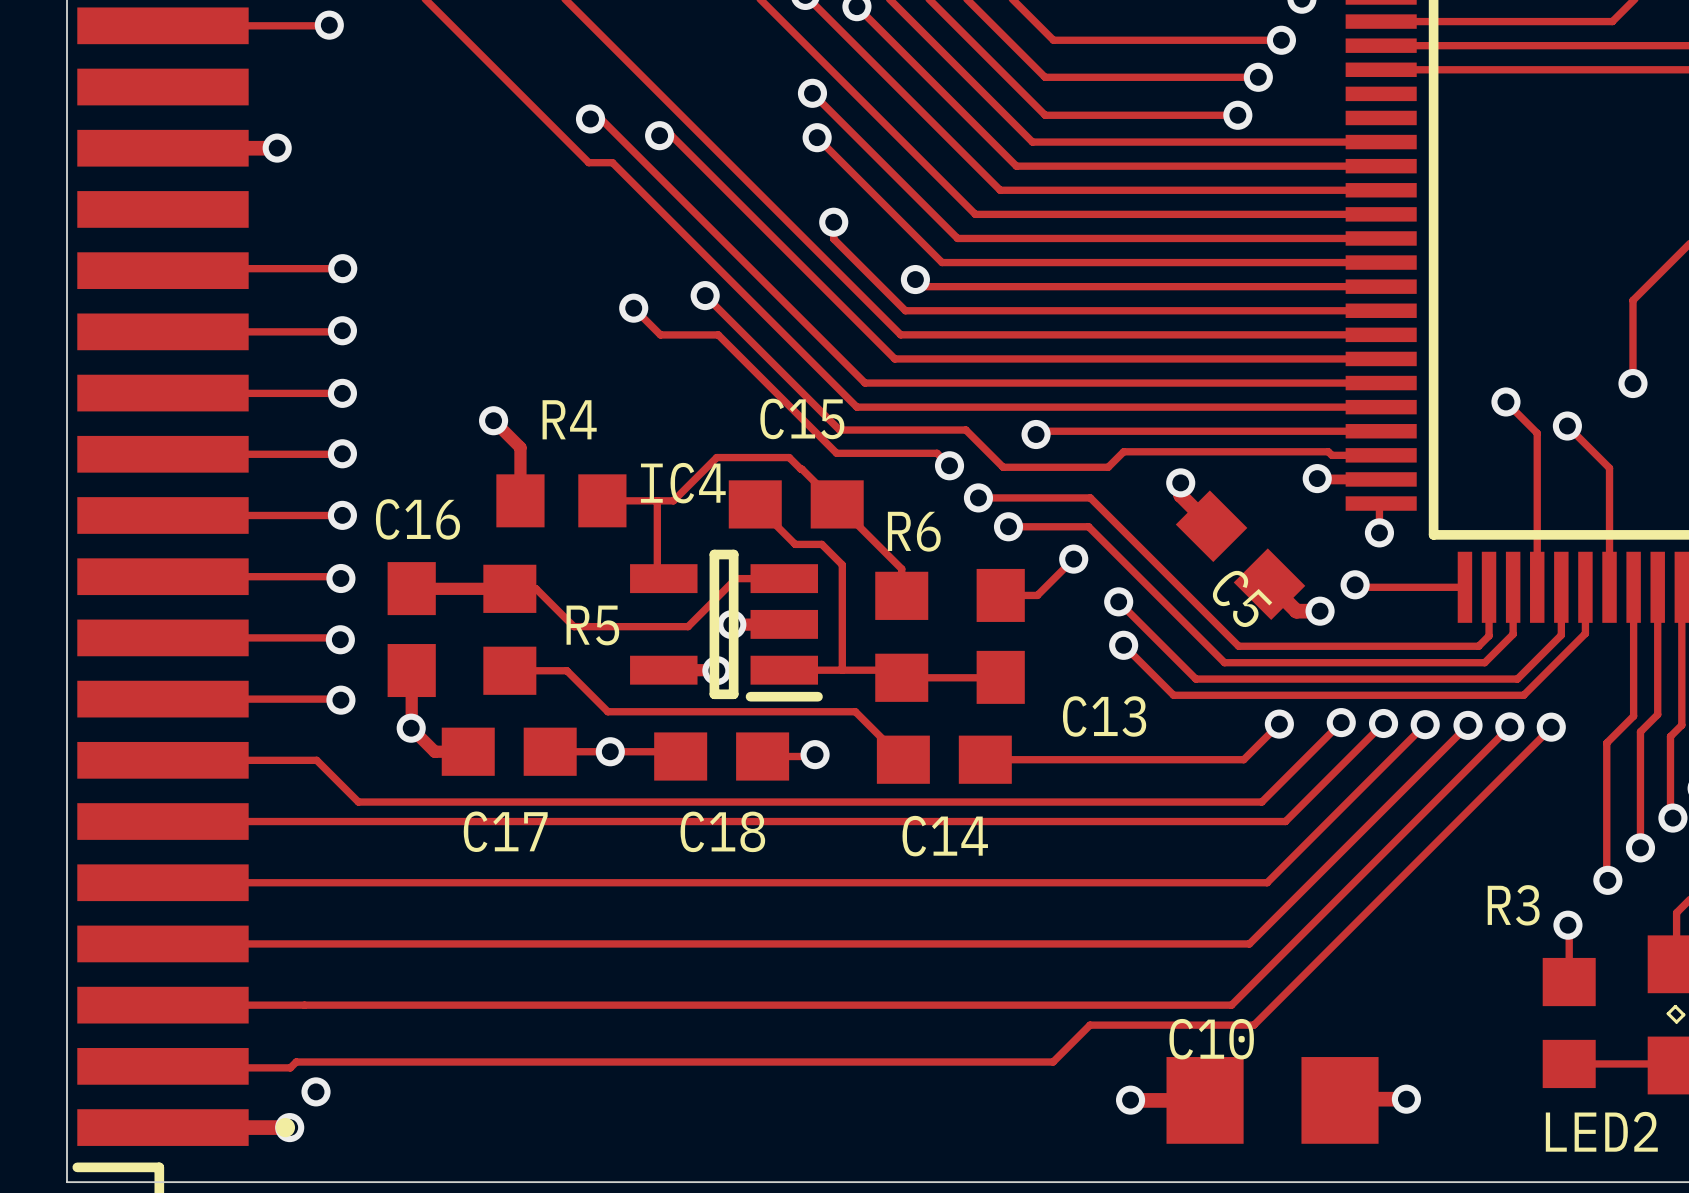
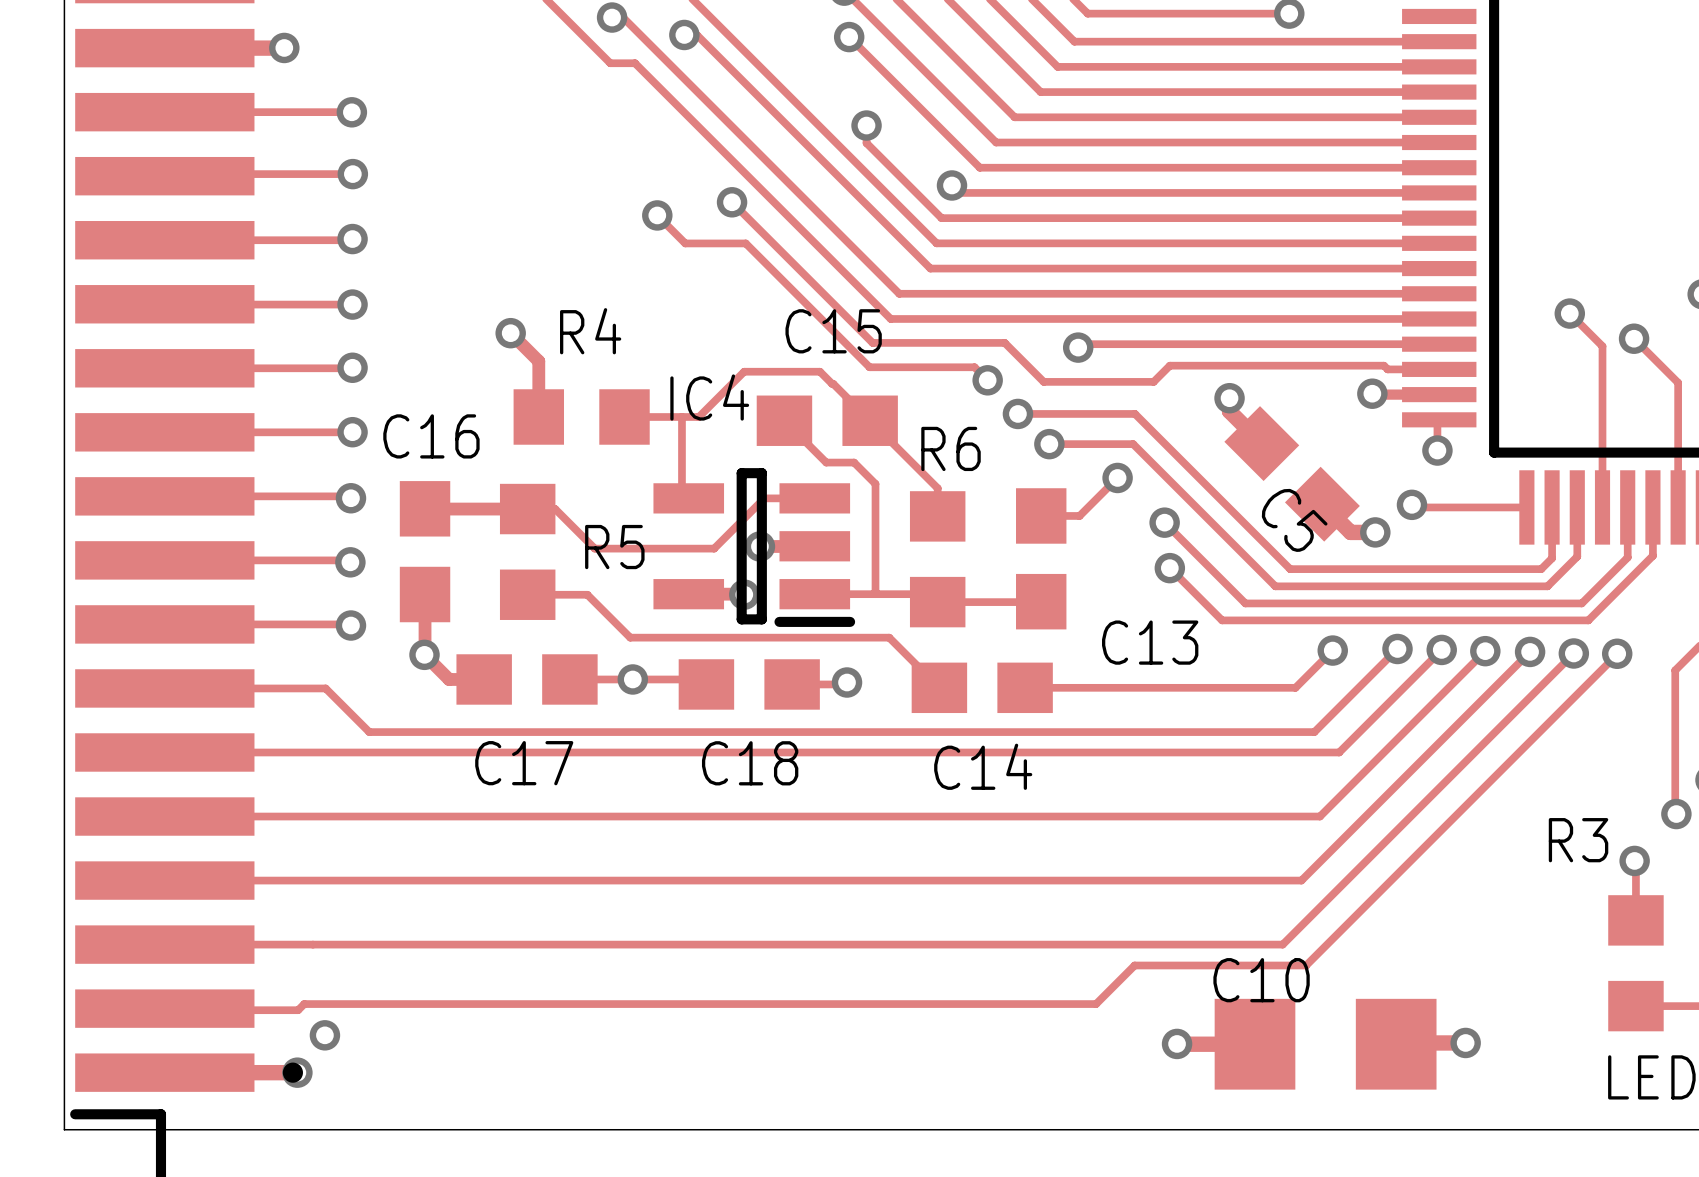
track: none -> (164, 112) (351, 112)
via: none -> (351, 112)

